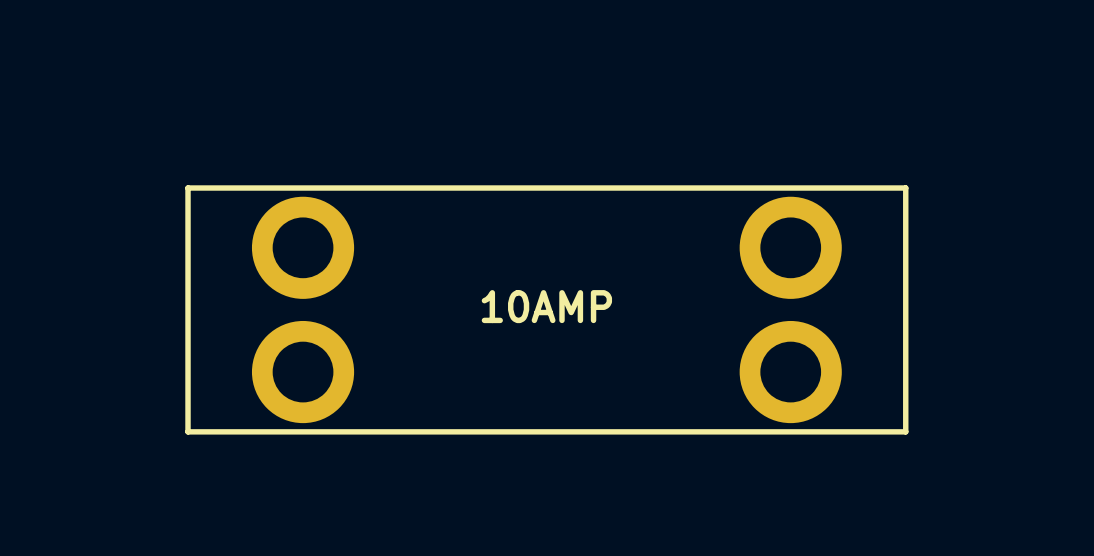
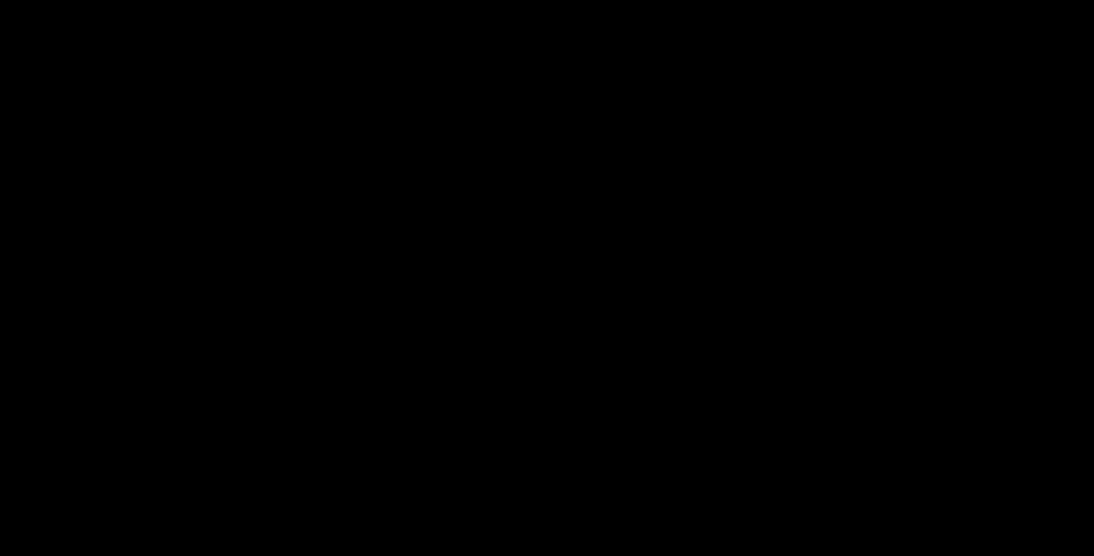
part: 10AMP (546, 309) -> none

